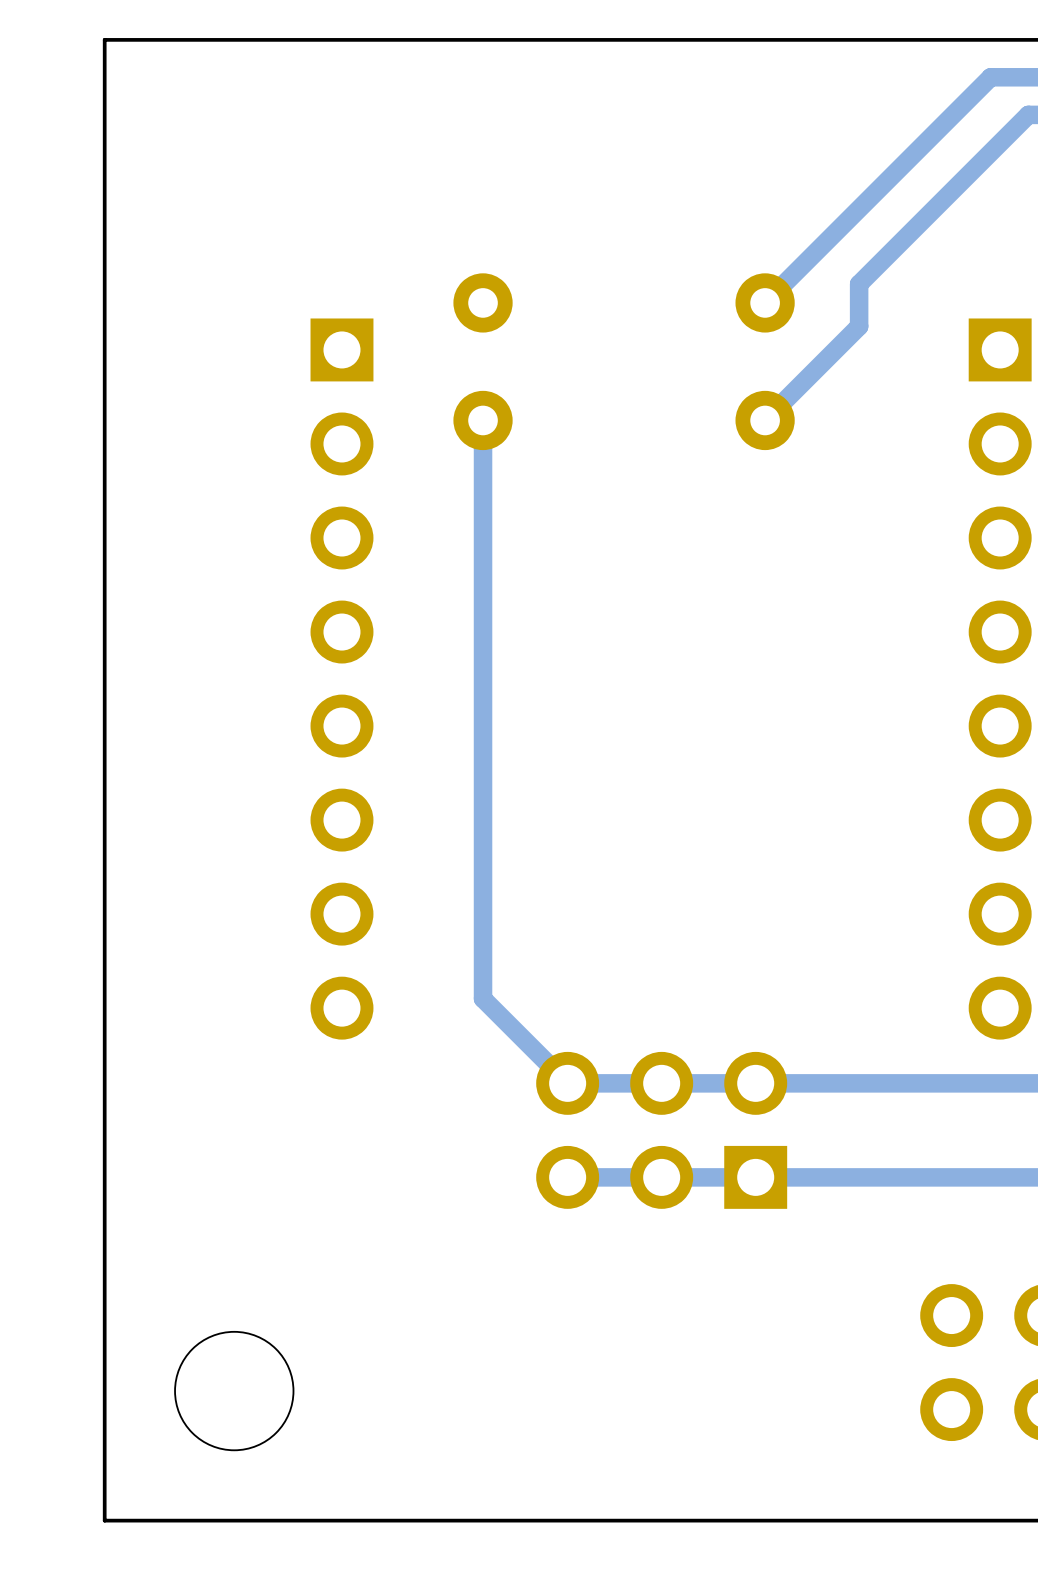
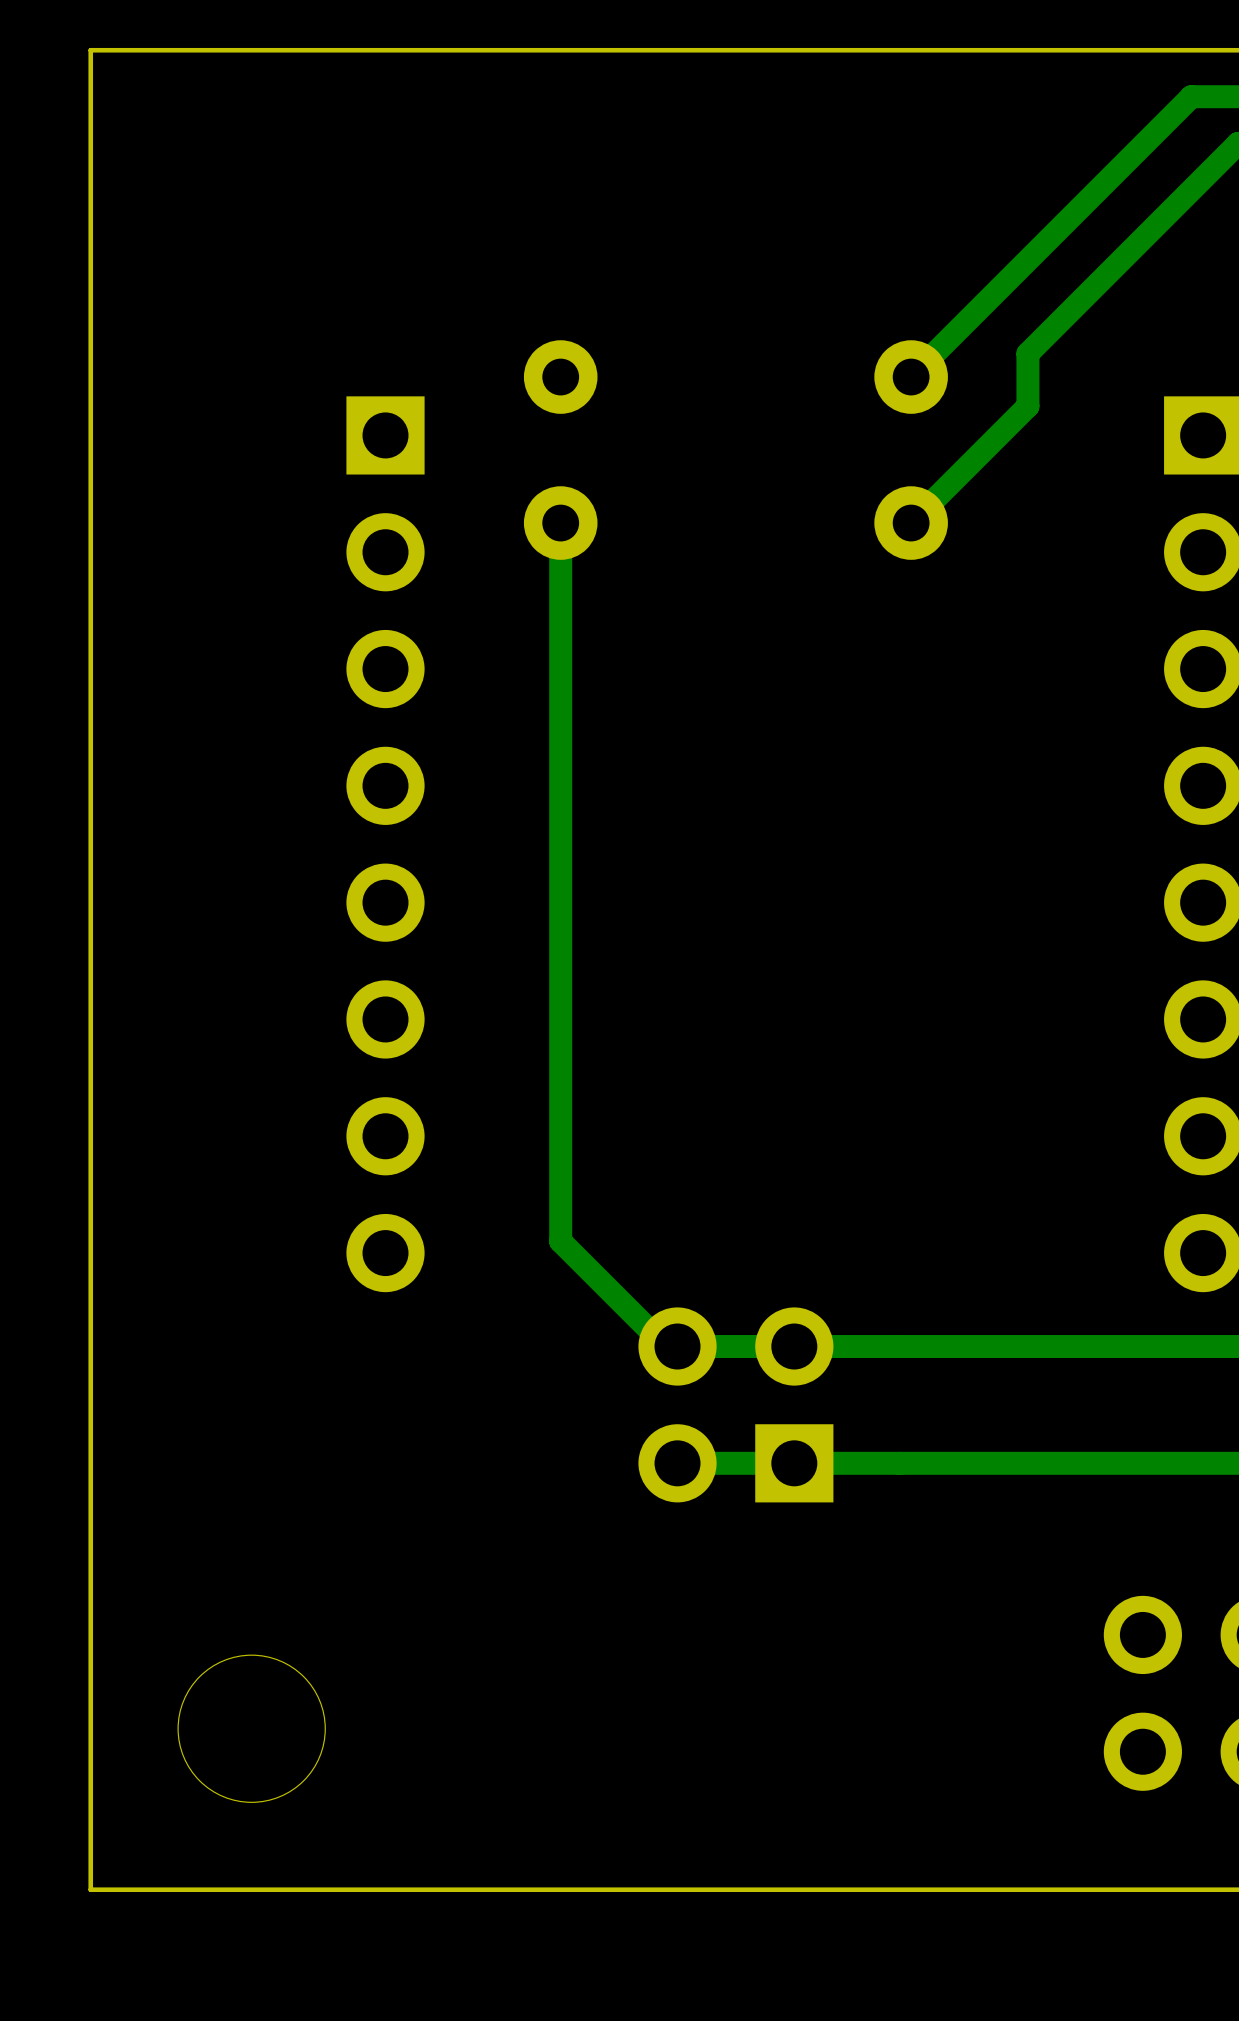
part: none -> (735, 1404)
part: (661, 1130) -> none

